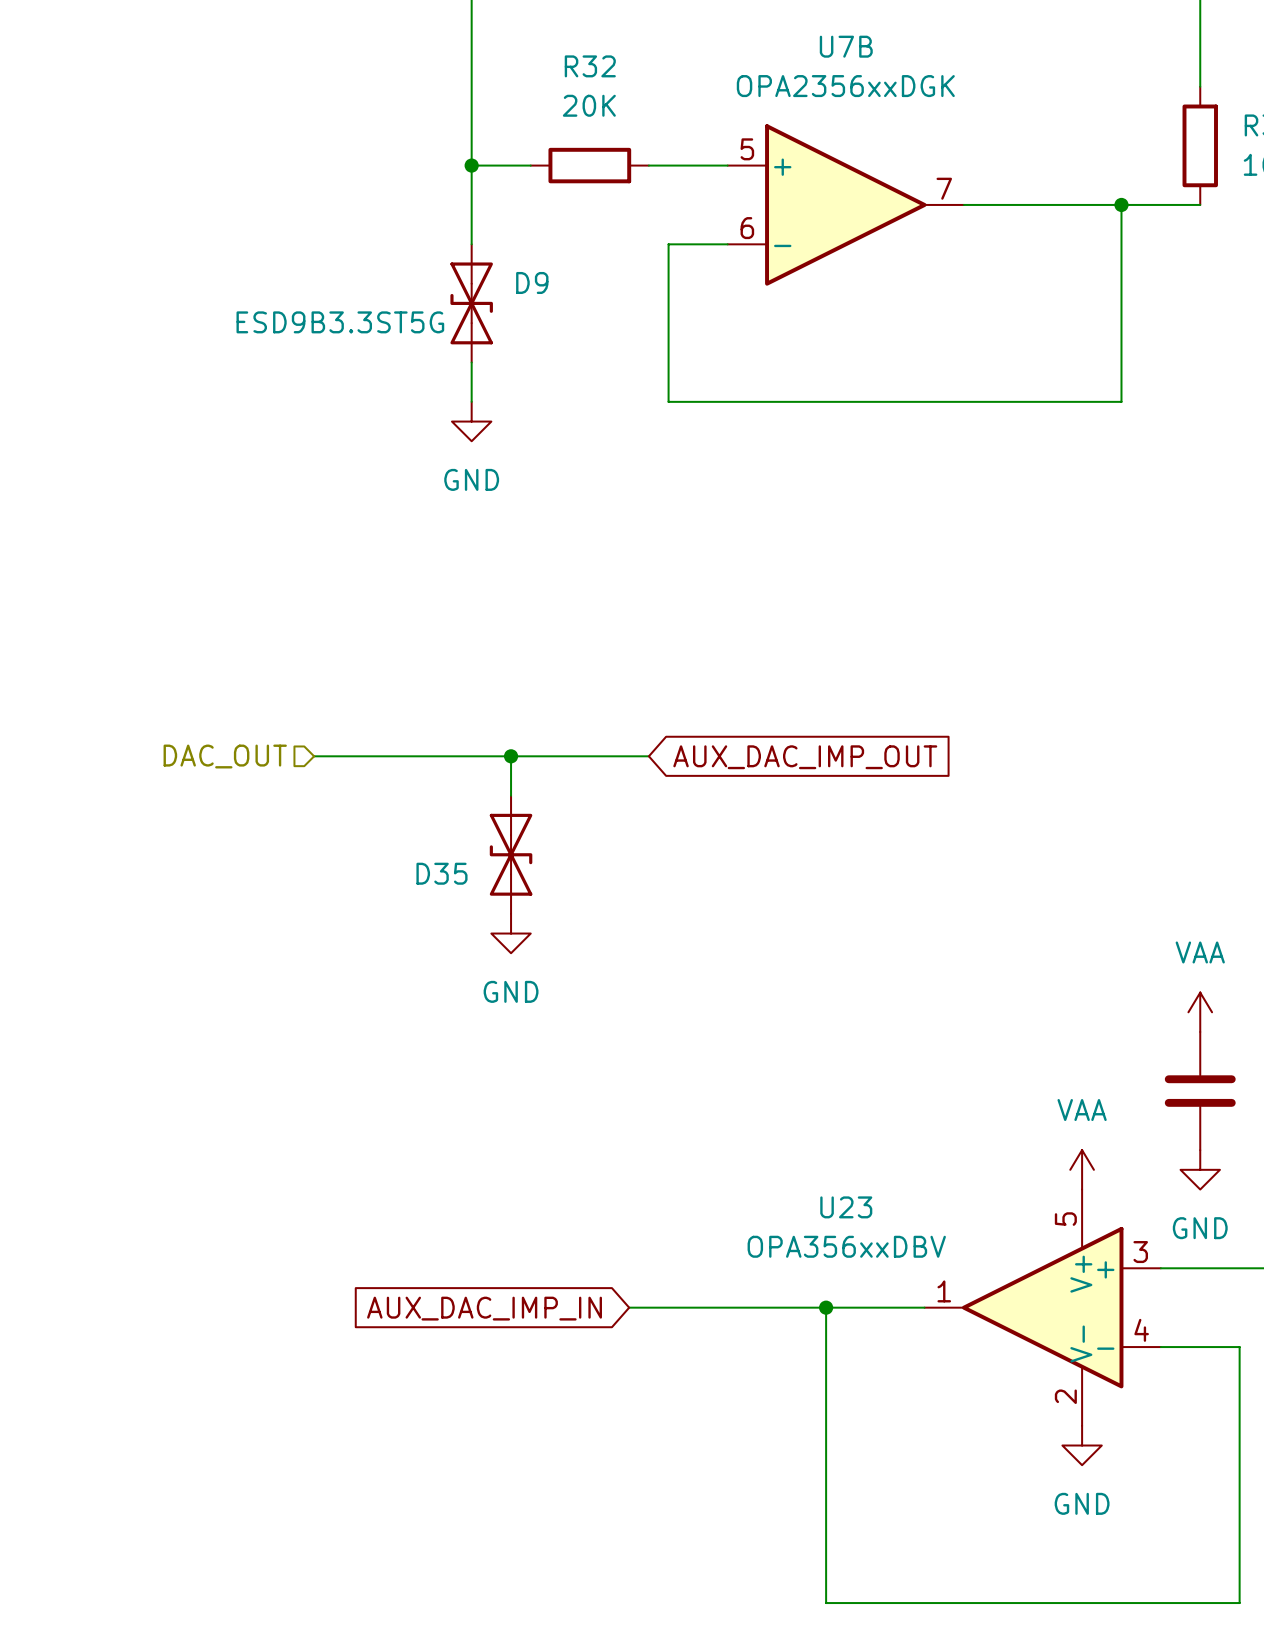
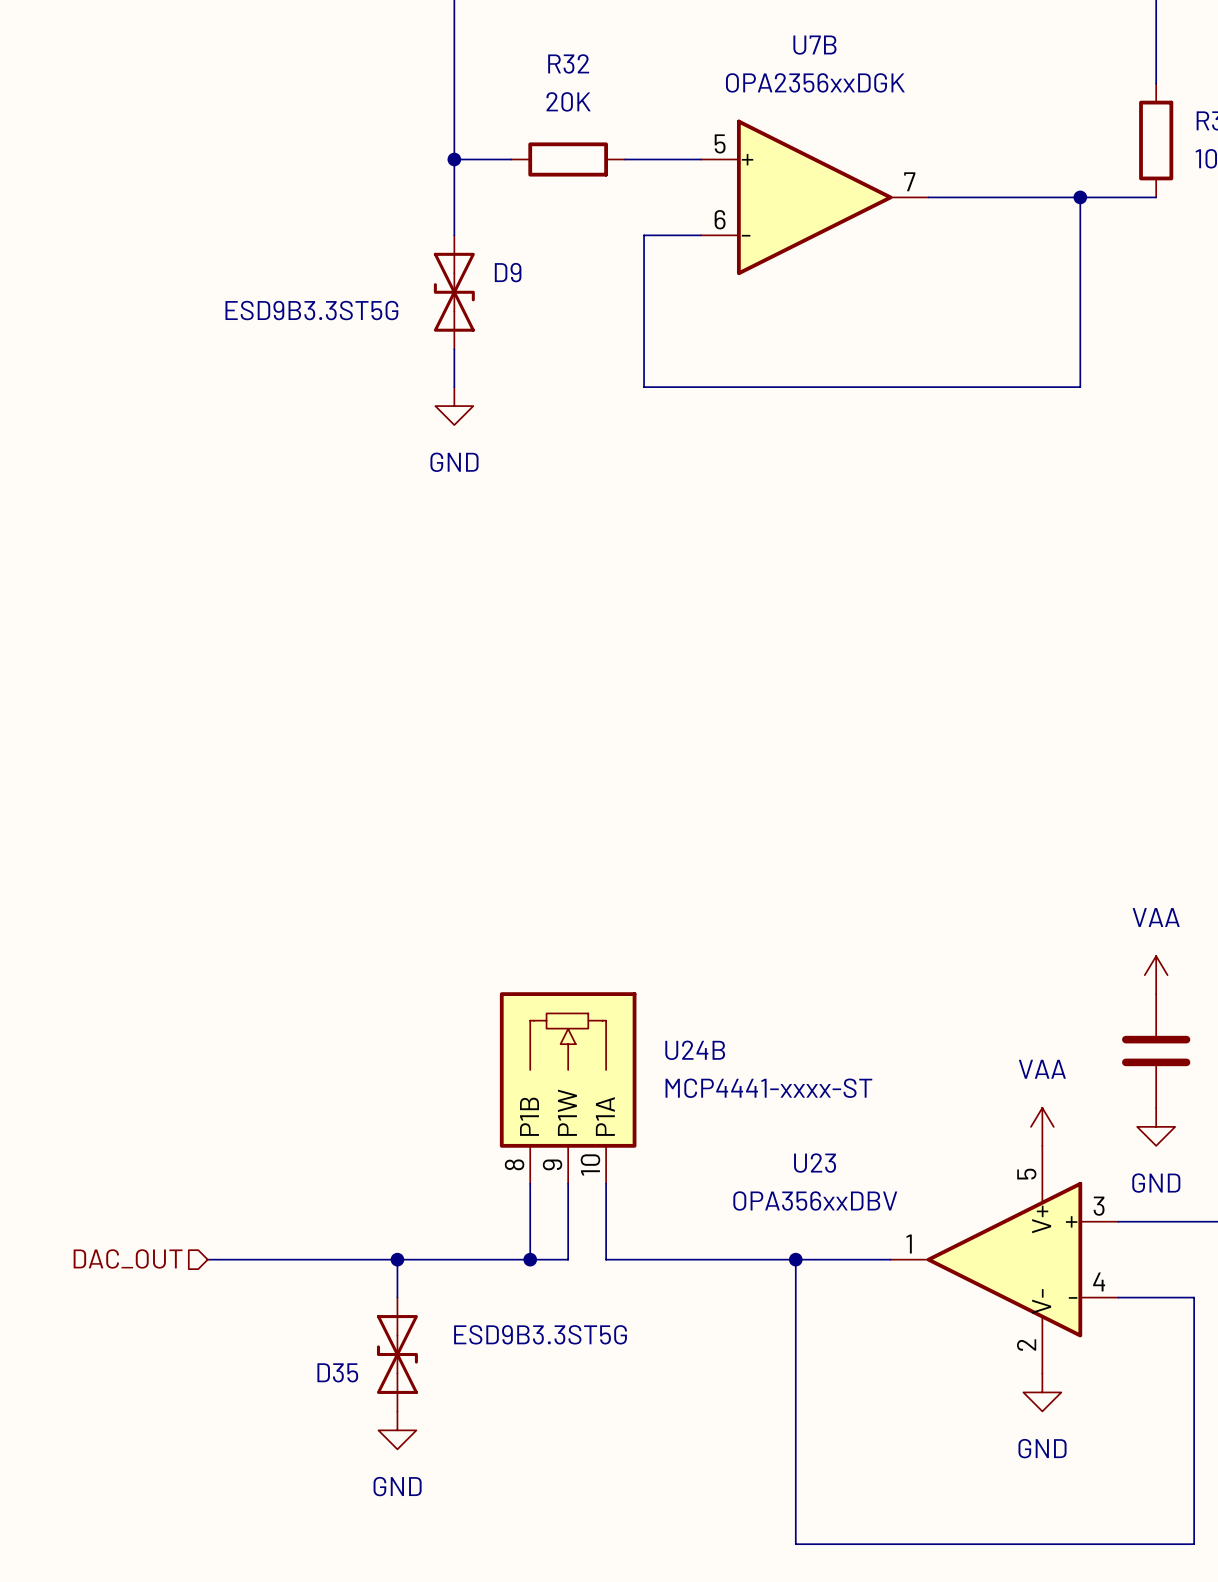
hierarchical label: DAC_OUT (225, 756) -> none
wire: (314, 756) (648, 756) -> none
wire: (511, 756) (511, 795) -> none
junction: (511, 756) -> none
global label: AUX_DAC_IMP_OUT (805, 757) -> none
D35 position: (511, 854) -> (397, 1354)
power symbol: GND (511, 933) -> none
U24B: none -> MCP4441-xxxx-ST (568, 1087)
wire: none -> (530, 1183) (530, 1259)
wire: none -> (568, 1183) (568, 1259) (207, 1259)
wire: none -> (606, 1183) (606, 1259)
hierarchical label: none -> DAC_OUT (128, 1258)
wire: none -> (397, 1259) (397, 1297)
junction: none -> (397, 1259)
junction: none -> (530, 1259)
global label: AUX_DAC_IMP_IN (484, 1308) -> none
D35 value: none -> ESD9B3.3ST5G (540, 1334)
power symbol: none -> GND (397, 1430)

